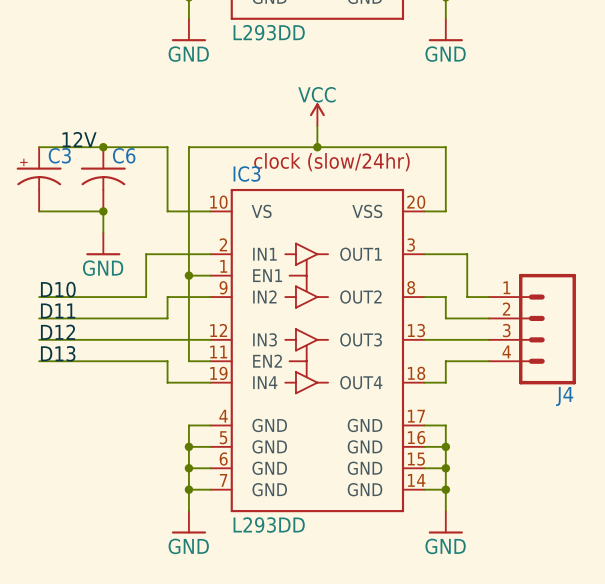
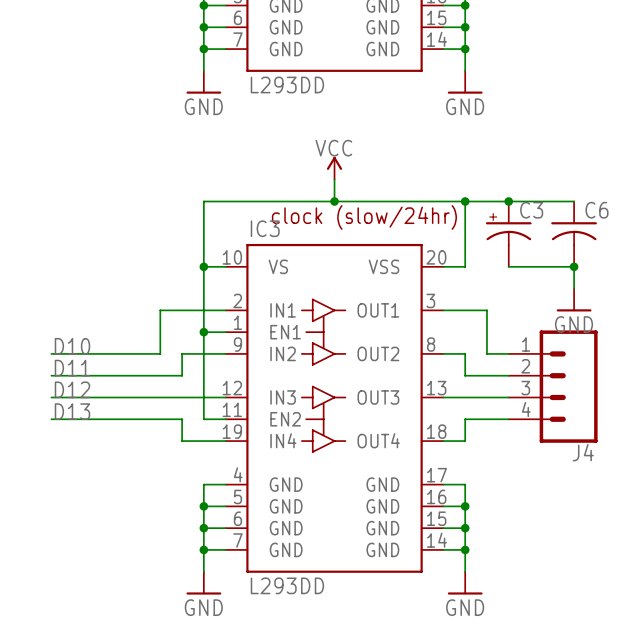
label: 12V (79, 139) -> none
wire: (39, 147) (167, 147) (167, 211) (188, 211) -> none
junction: (103, 147) -> none
wire: none -> (465, 201) (574, 201)
junction: none -> (465, 201)
junction: none -> (508, 201)
C3 position: (39, 179) -> (508, 234)
C6 position: (103, 179) -> (574, 234)
wire: (39, 211) (103, 211) (103, 232) -> none
junction: (103, 211) -> none
junction: none -> (203, 266)
wire: none -> (508, 266) (574, 266) (574, 288)
junction: none -> (574, 266)
power symbol: GND (103, 244) -> none
power symbol: none -> GND (574, 300)

